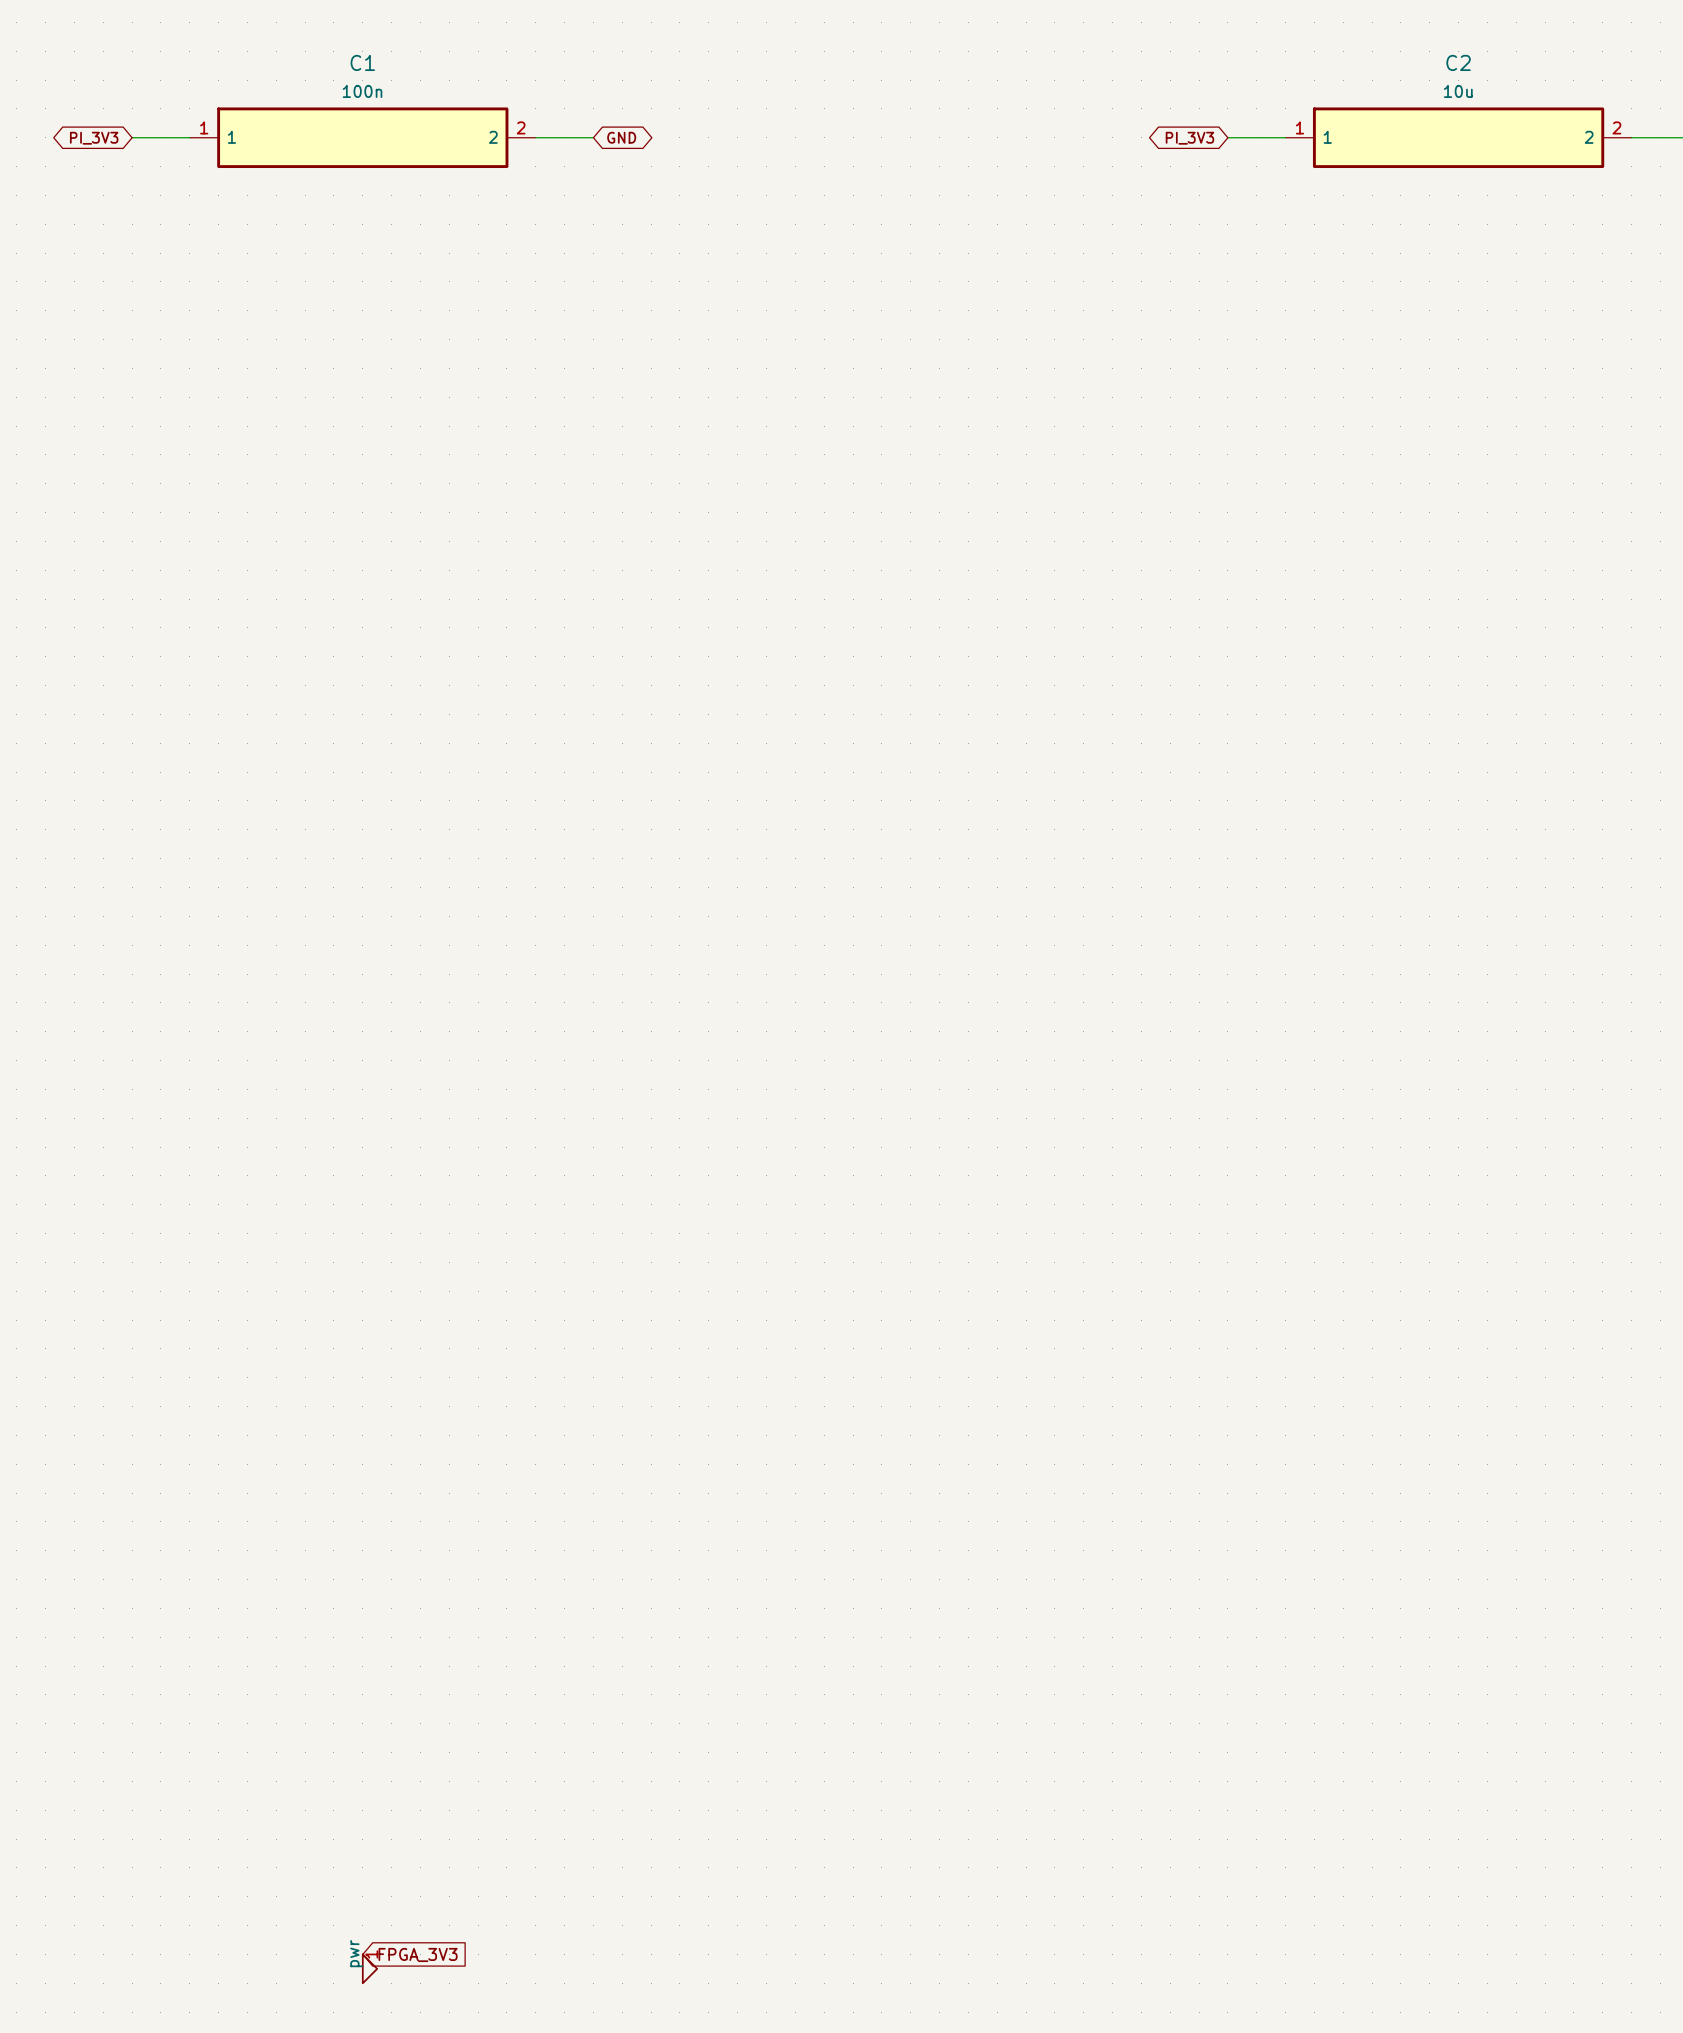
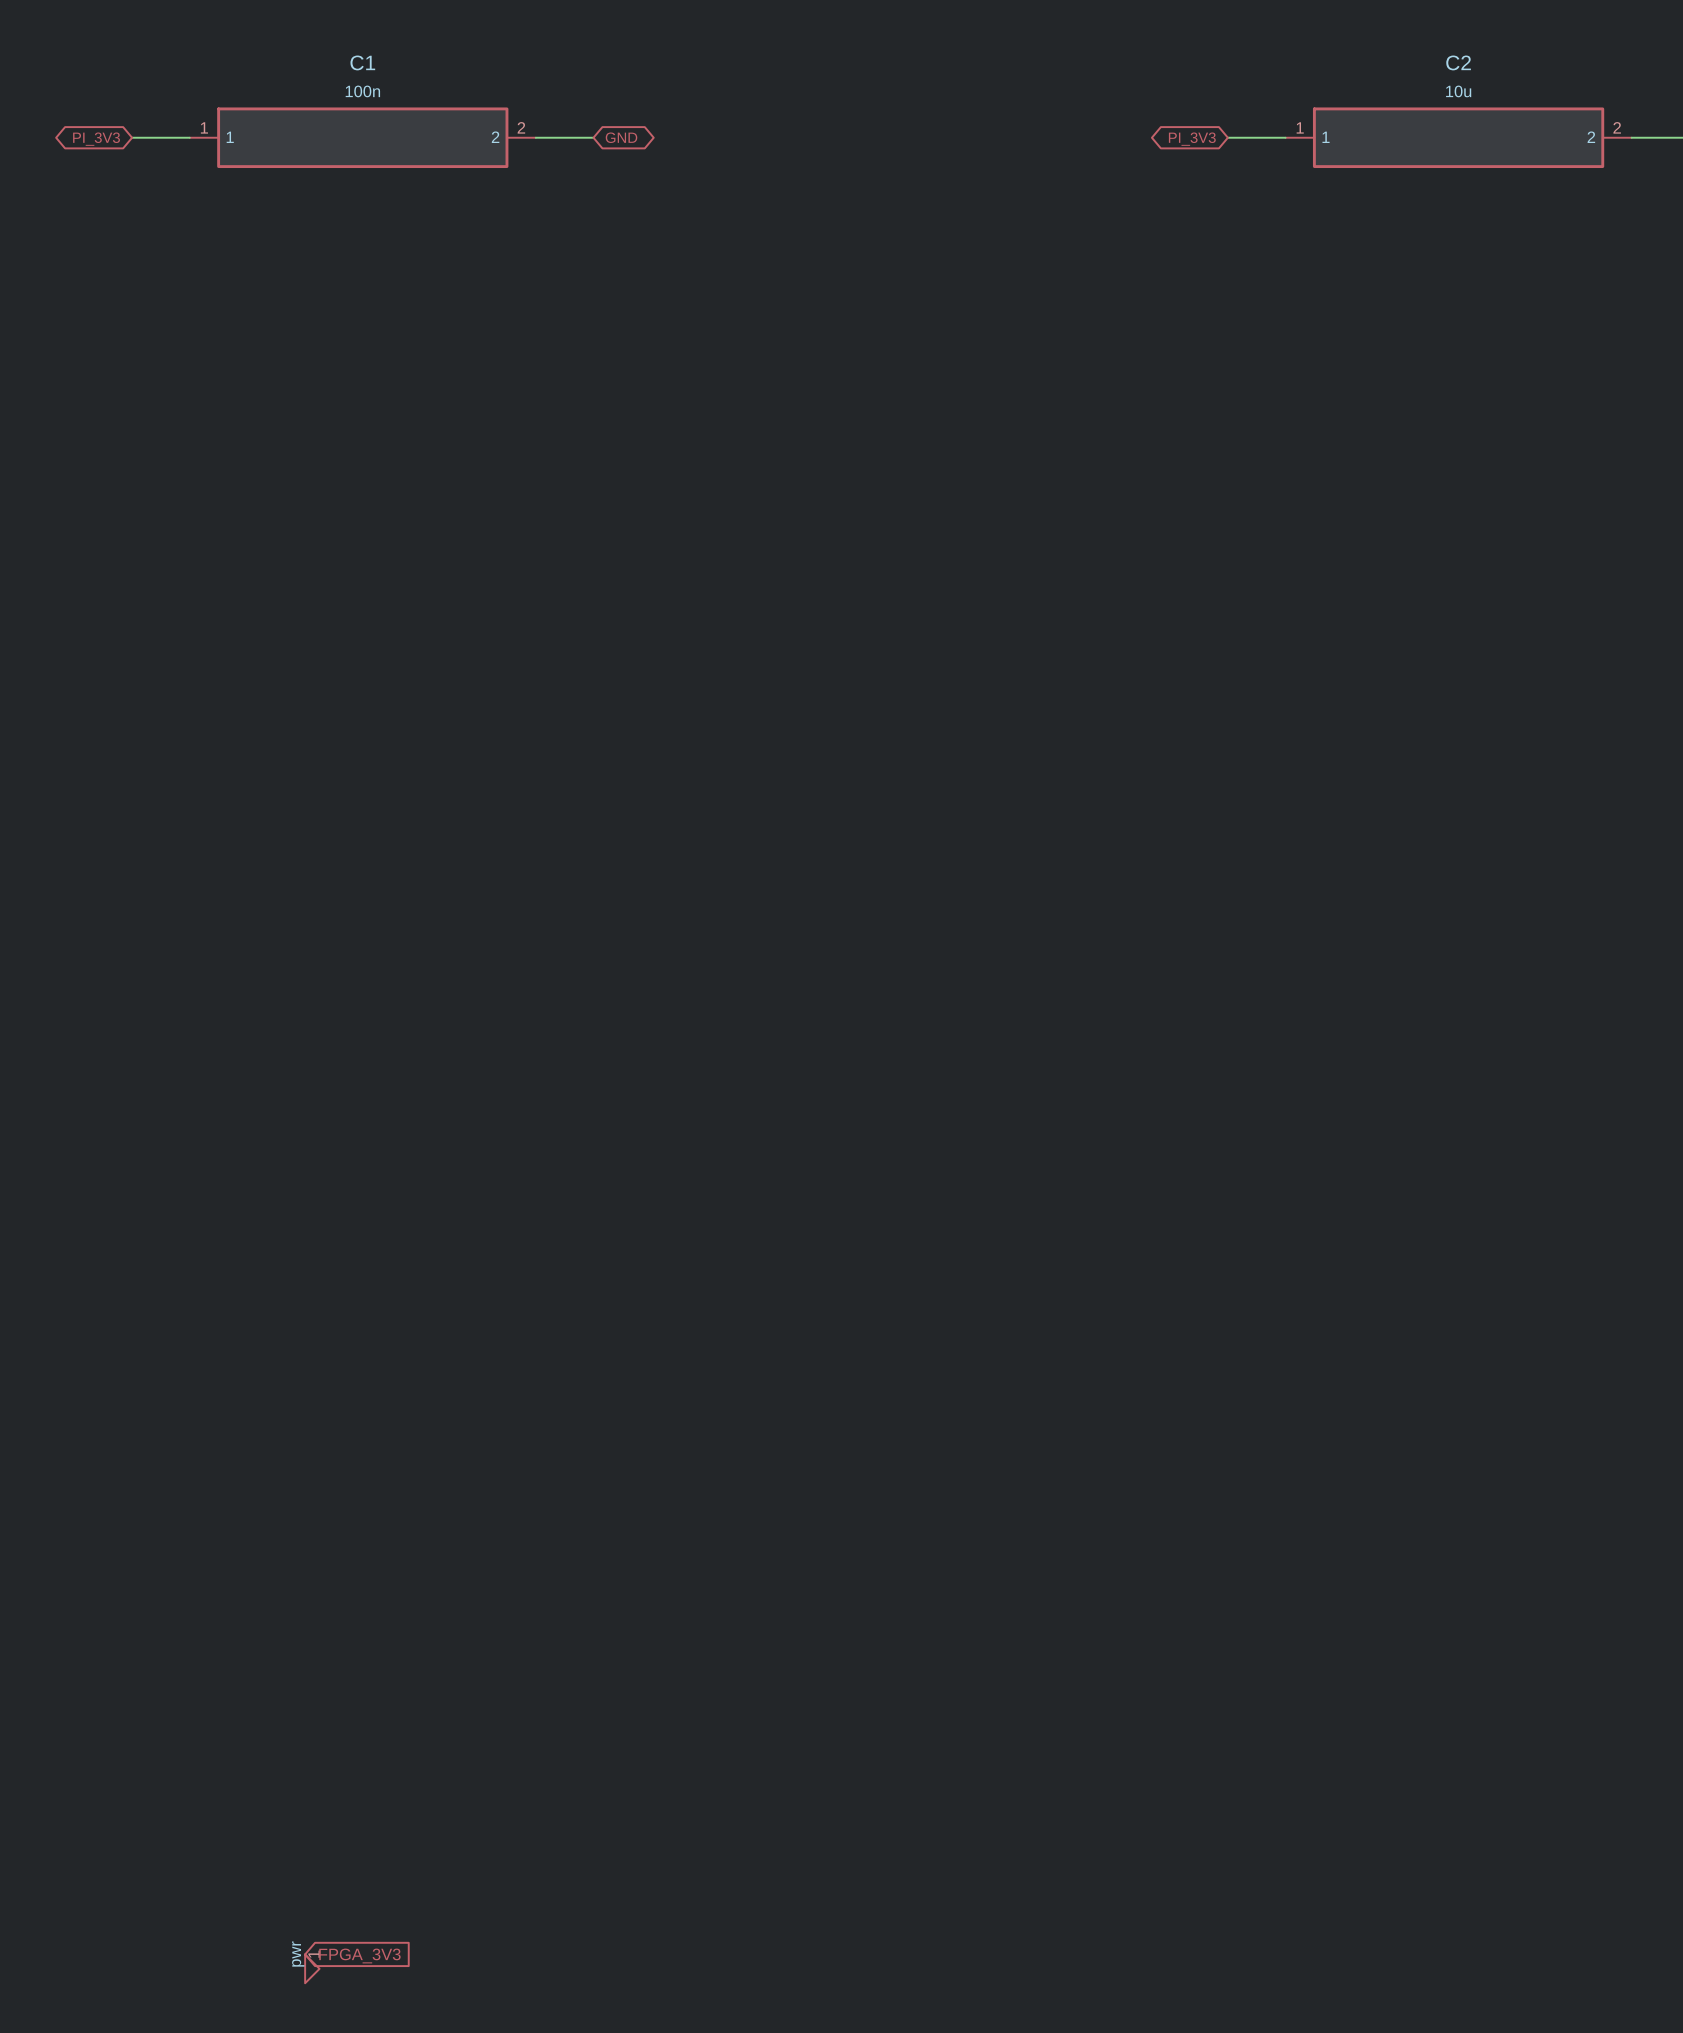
global label position: FPGA_3V3 (418, 1954) -> FPGA_3V3 (359, 1955)
power symbol position: (370, 1968) -> (312, 1968)

